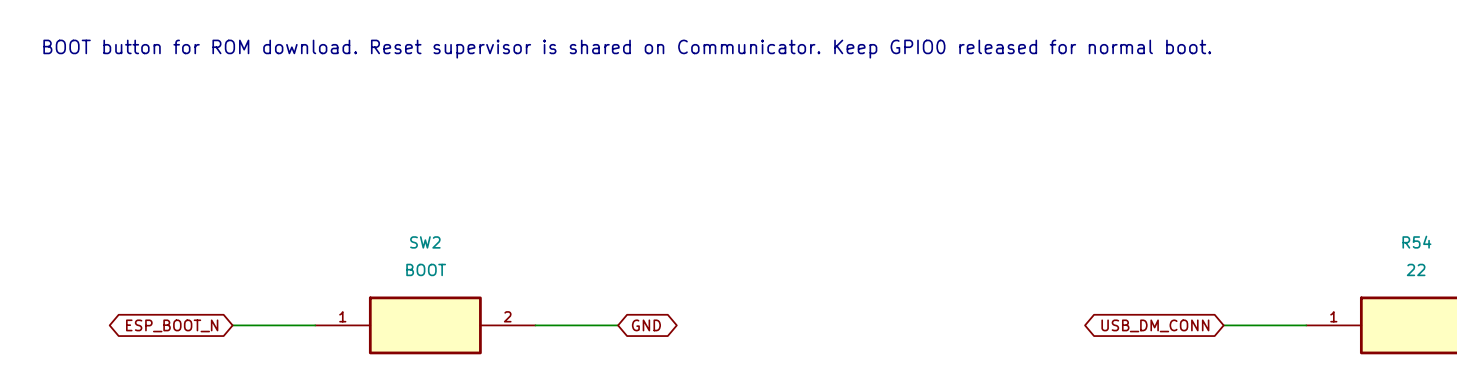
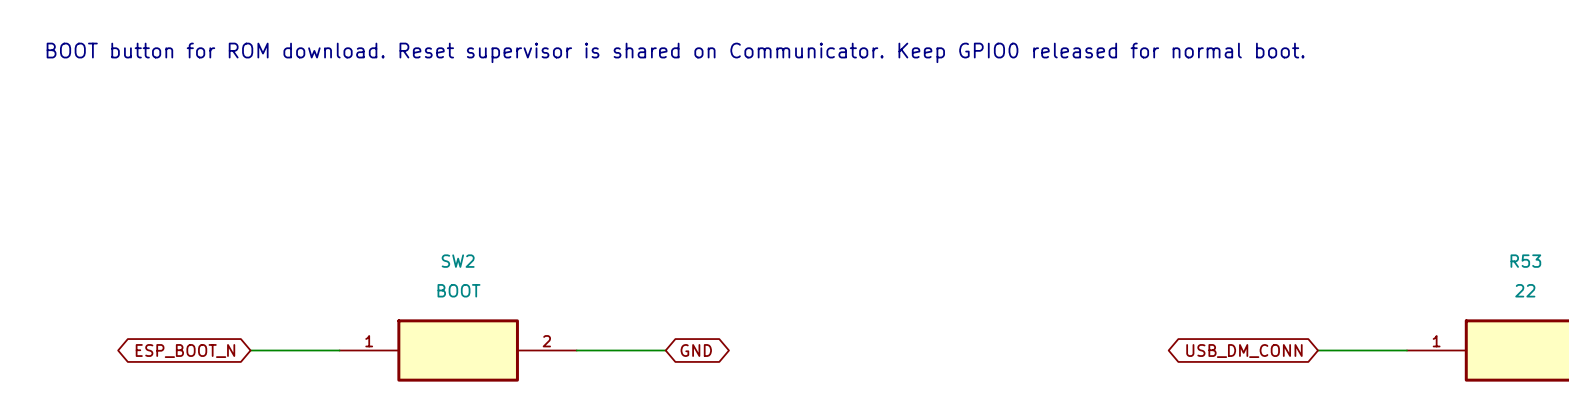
R54 name: R54 (1416, 242) -> R53 (1525, 261)

